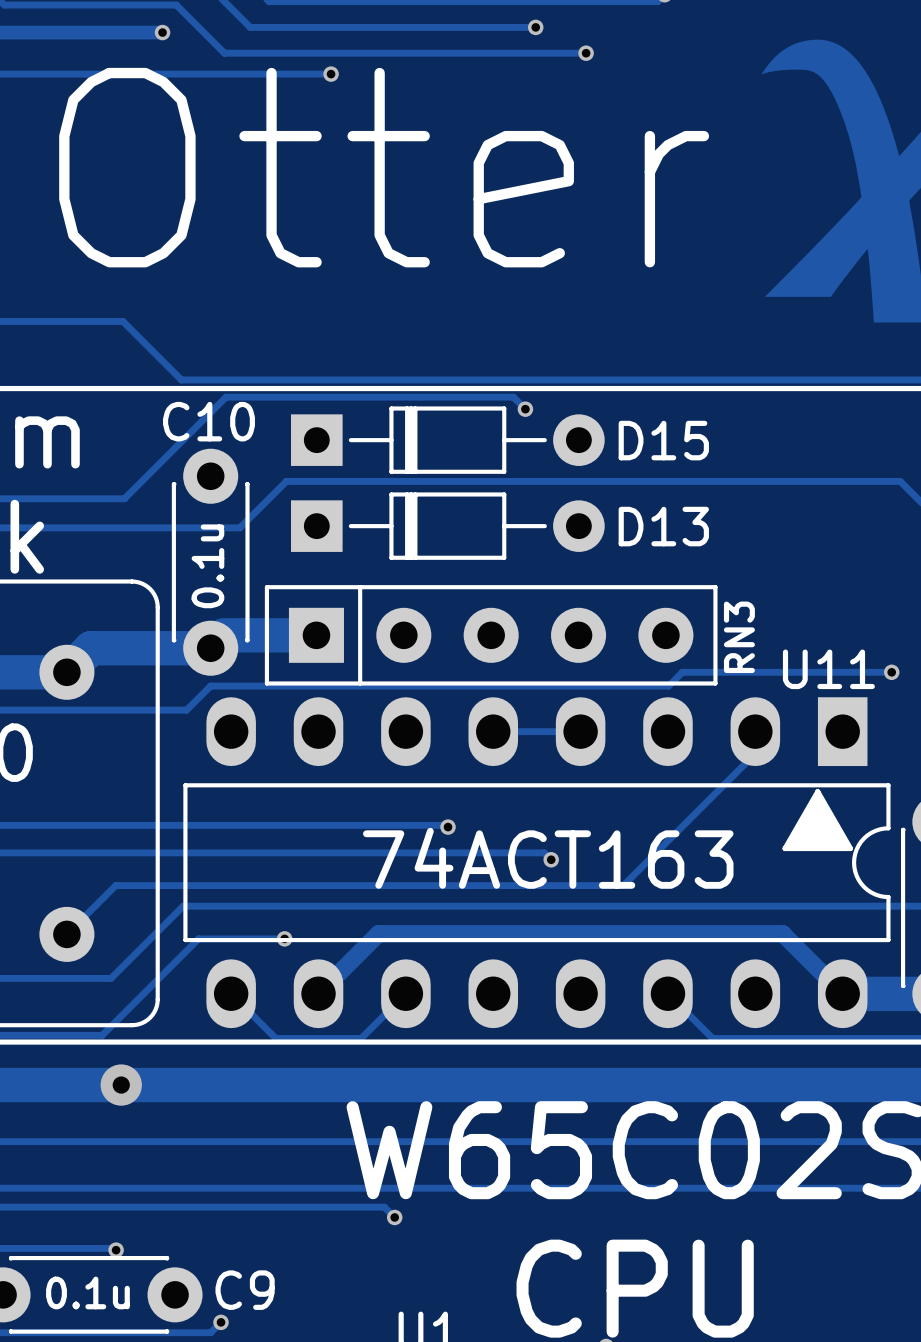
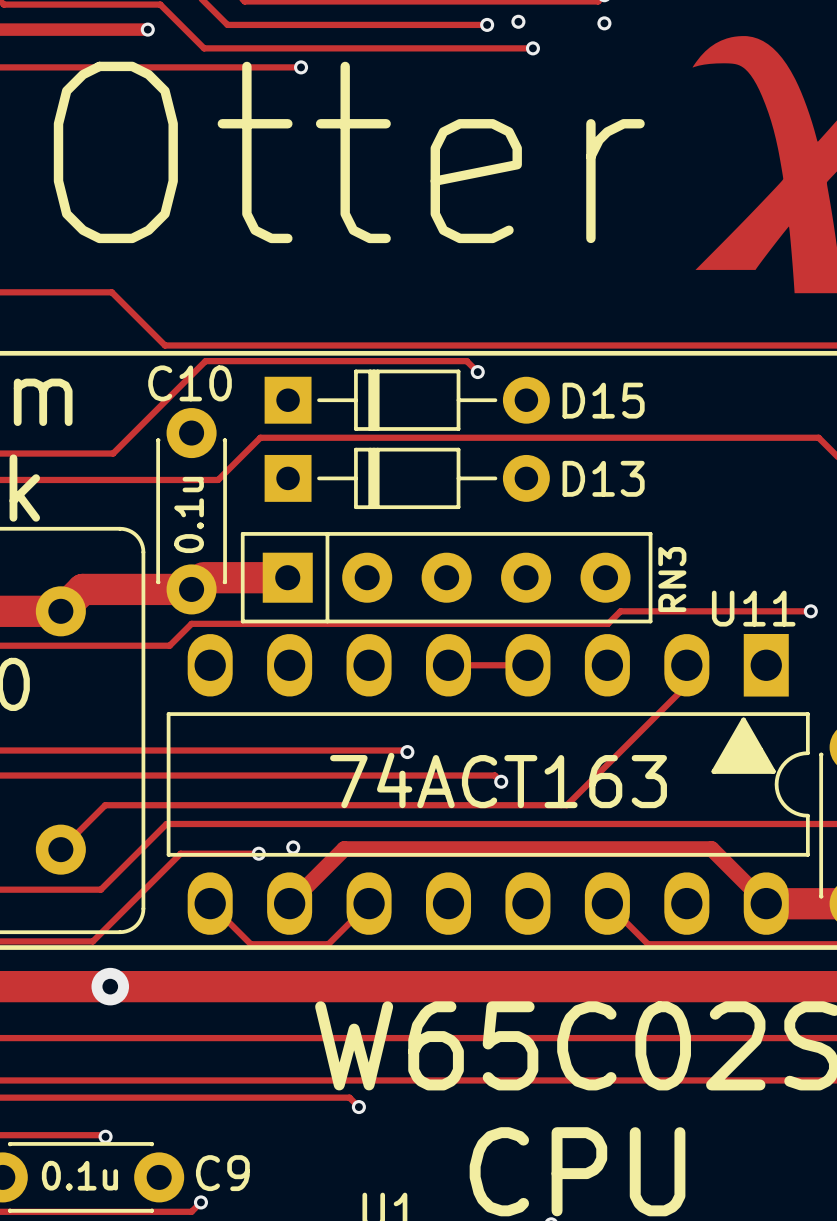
via: none -> (518, 21)
via: none -> (604, 23)
via: none -> (293, 847)

